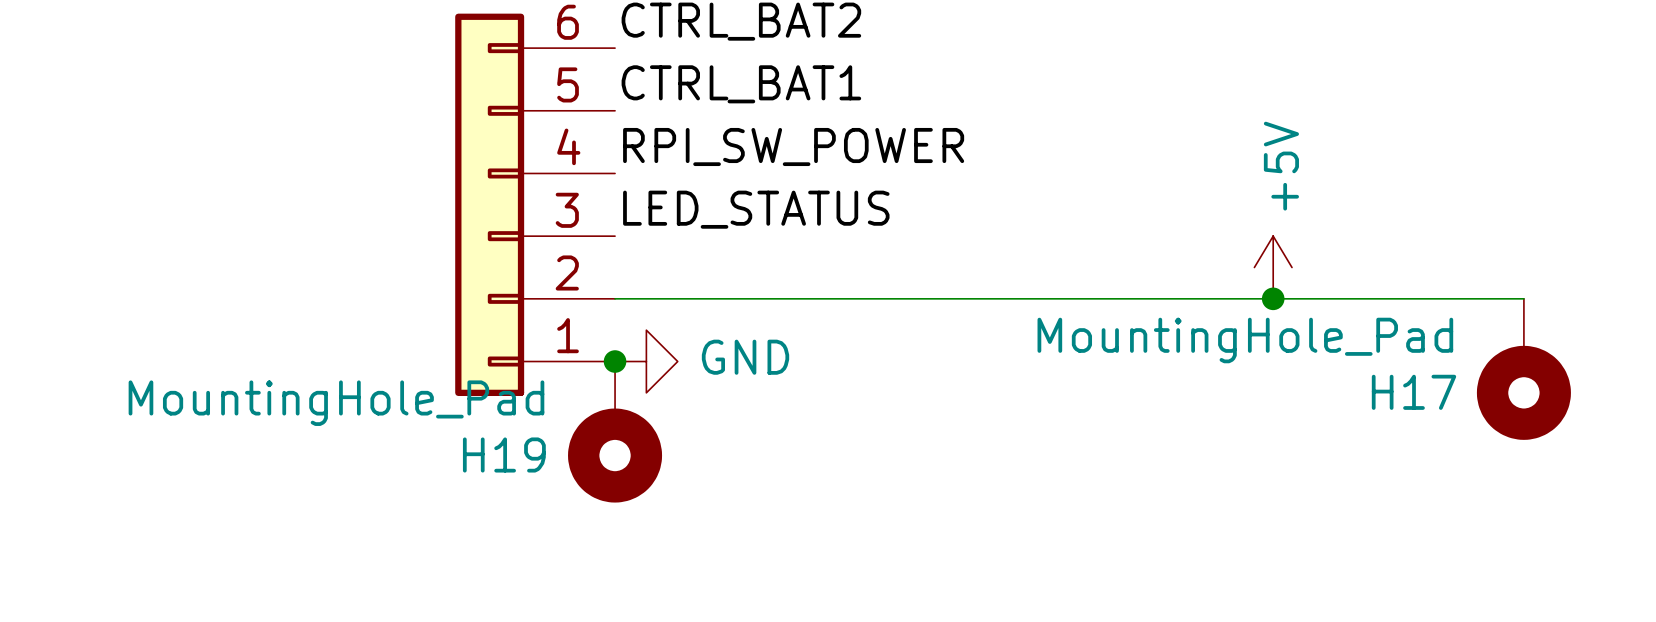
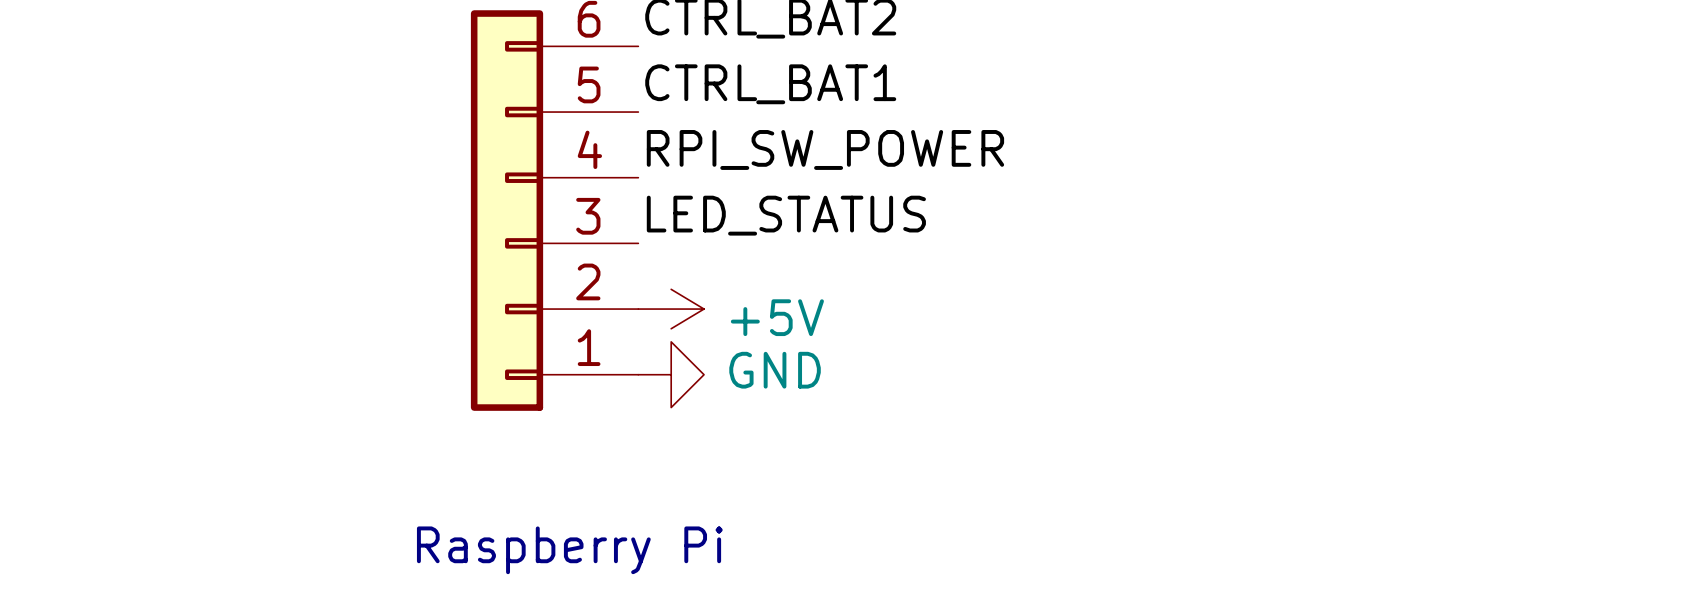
power symbol: +5V (1273, 267) -> none
wire: (615, 298) (1523, 298) -> none
power symbol: none -> +5V (671, 309)
junction: (1273, 298) -> none
junction: (615, 361) -> none
H17: MountingHole_Pad (1523, 369) -> none
H19: MountingHole_Pad (615, 432) -> none
text: none -> Raspberry Pi (569, 550)

